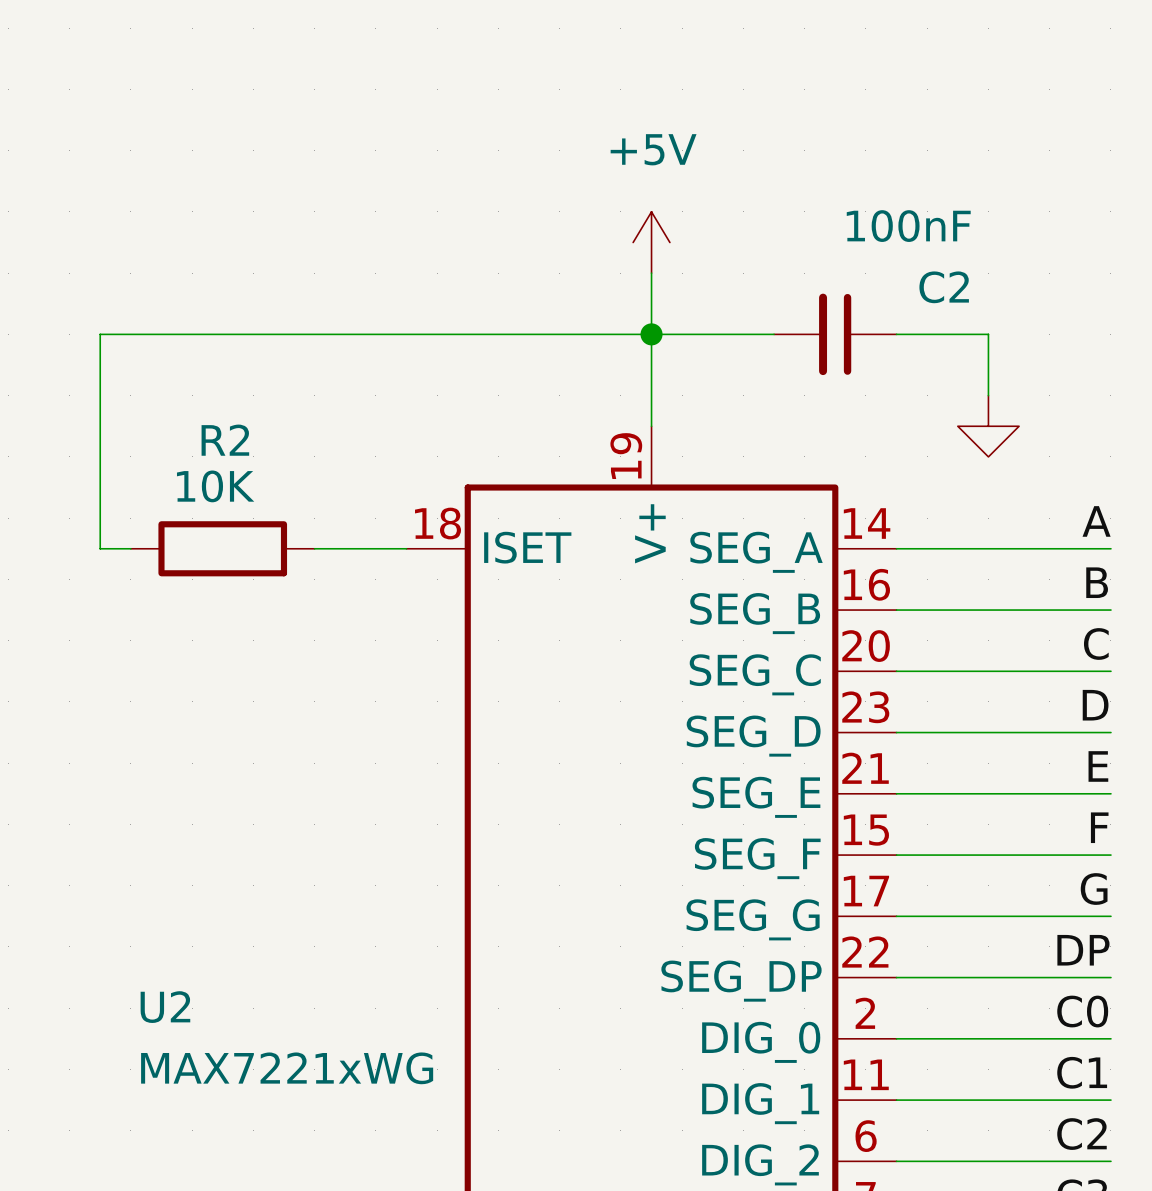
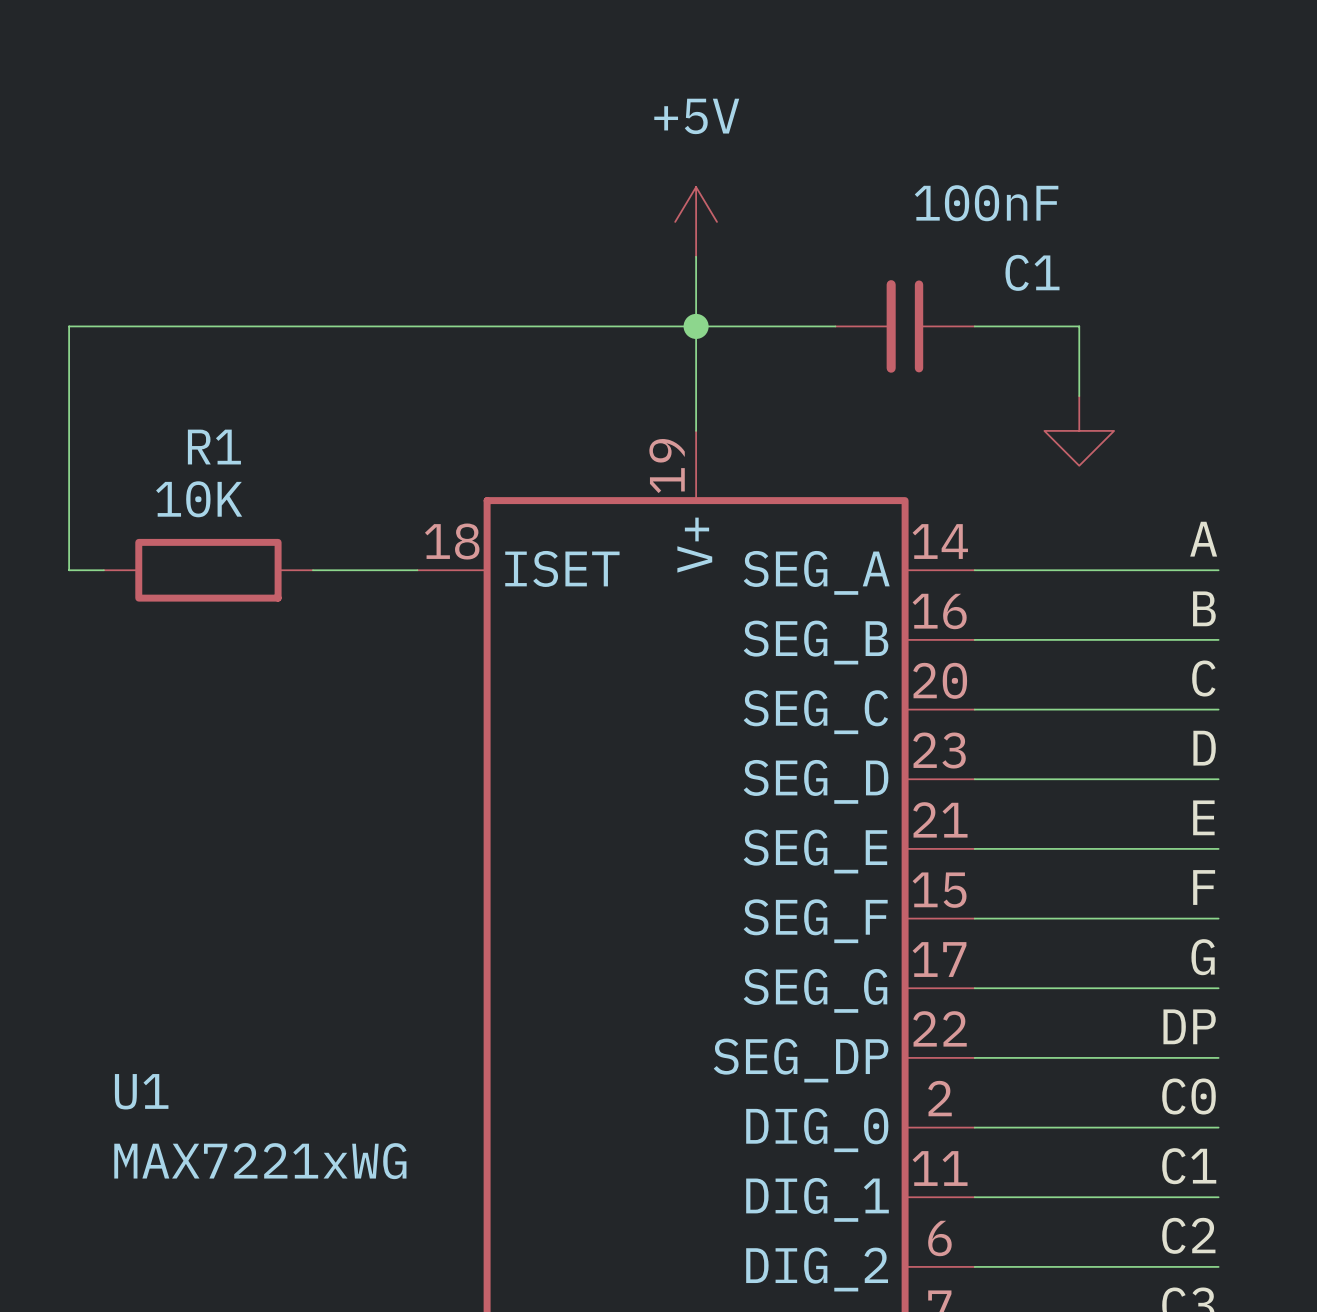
C2 name: C2 (944, 287) -> C1 (1032, 272)
R2 name: R2 (225, 440) -> R1 (214, 447)
U2 name: U2 (165, 1007) -> U1 (141, 1091)

